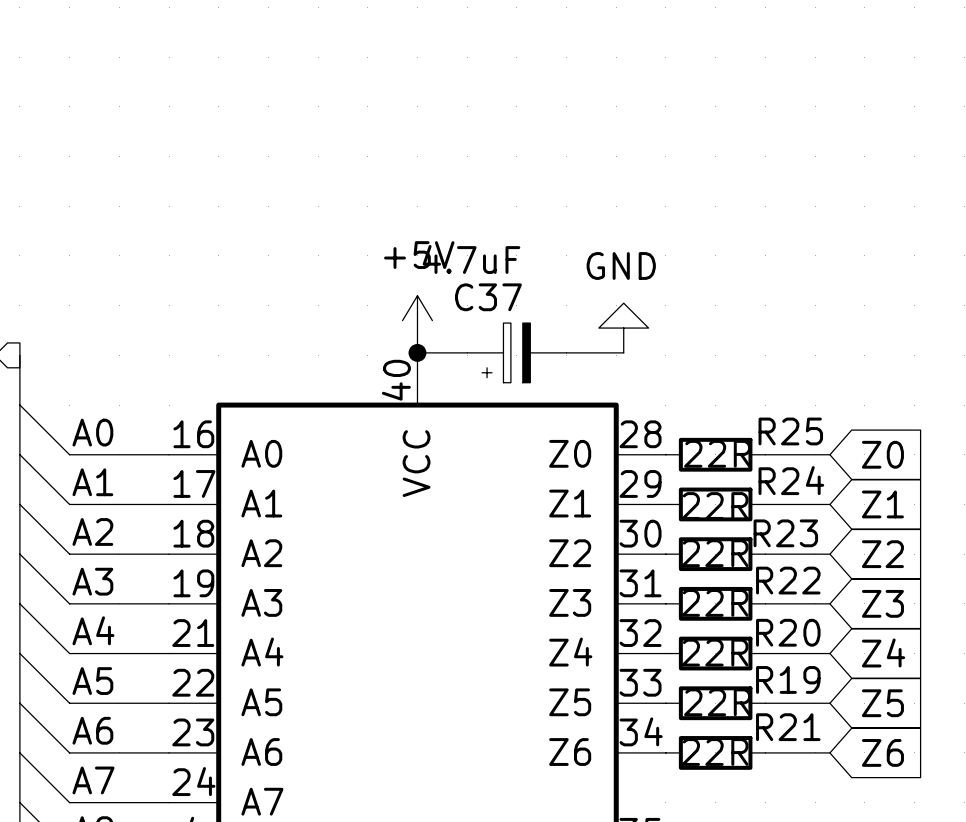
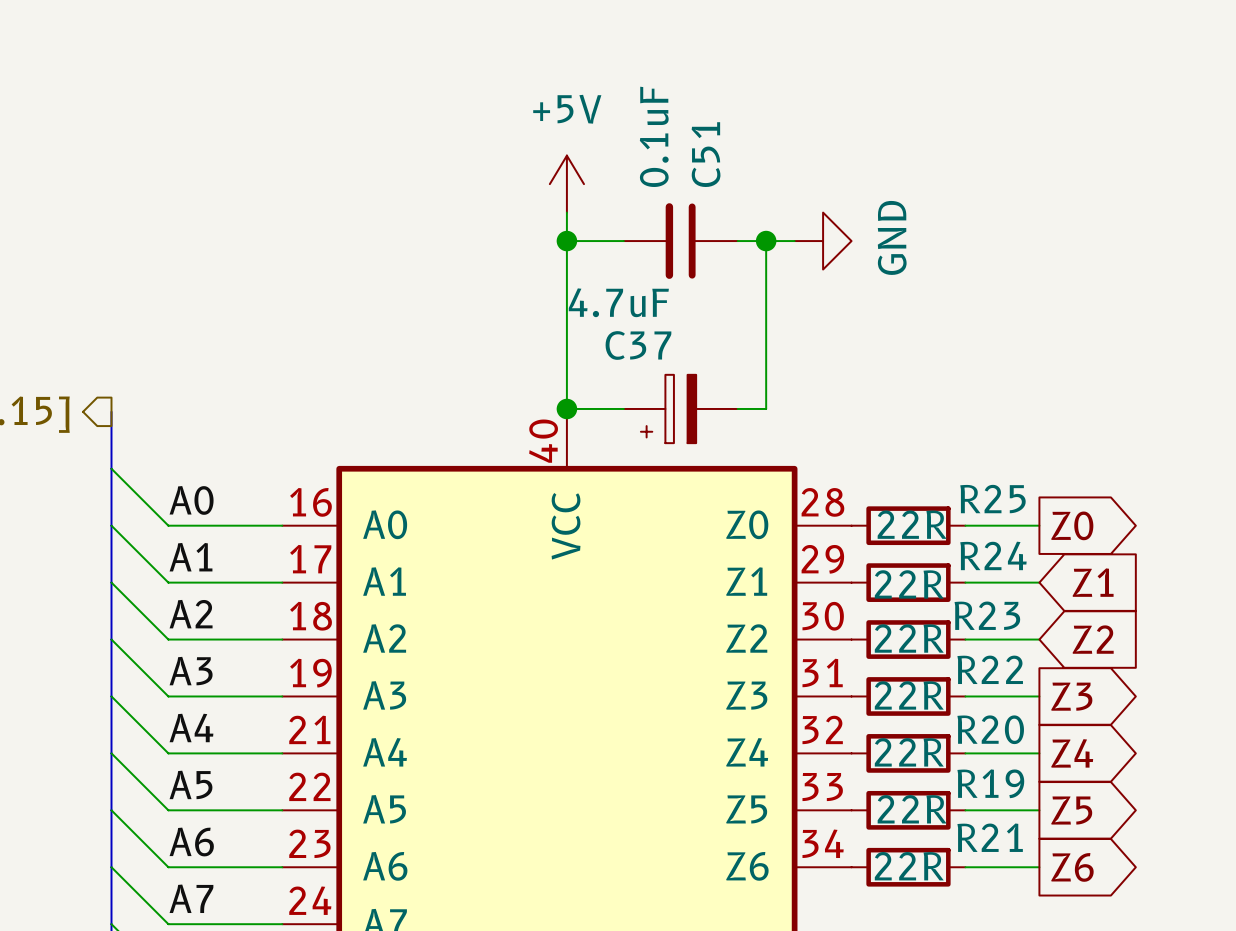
wire: none -> (566, 212) (566, 400)
wire: none -> (566, 241) (623, 241)
junction: none -> (566, 241)
C51: none -> 0.1uF (680, 241)
wire: none -> (737, 241) (794, 241)
junction: none -> (766, 241)
power symbol position: +5V (417, 320) -> +5V (566, 184)
power symbol rotation: 0° (623, 328) -> 90° clockwise (823, 241)
power symbol position: GND (623, 328) -> GND (823, 241)
wire: (591, 352) (623, 352) -> (766, 408) (766, 241)
global label shape: input (882, 454) -> output (1072, 525)
global label shape: input (882, 603) -> output (1071, 696)
global label shape: input (883, 652) -> output (1072, 753)
global label shape: input (882, 703) -> output (1071, 810)
global label shape: input (882, 752) -> output (1072, 867)

